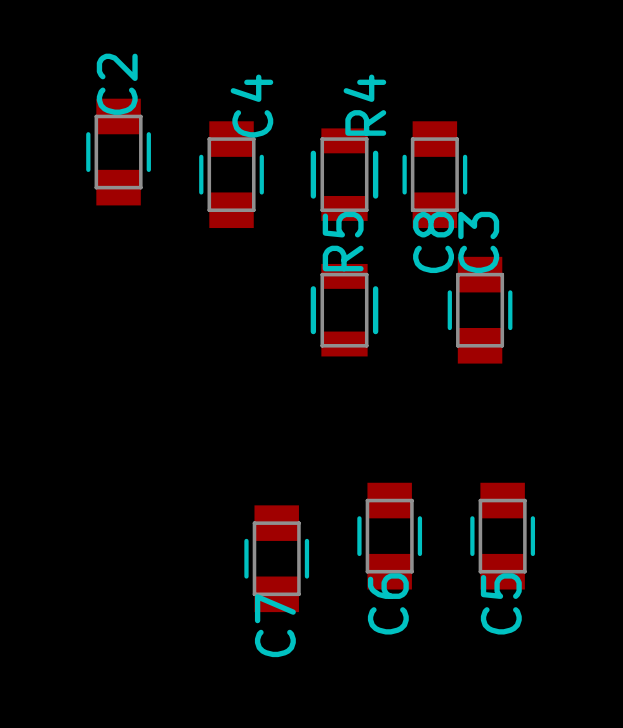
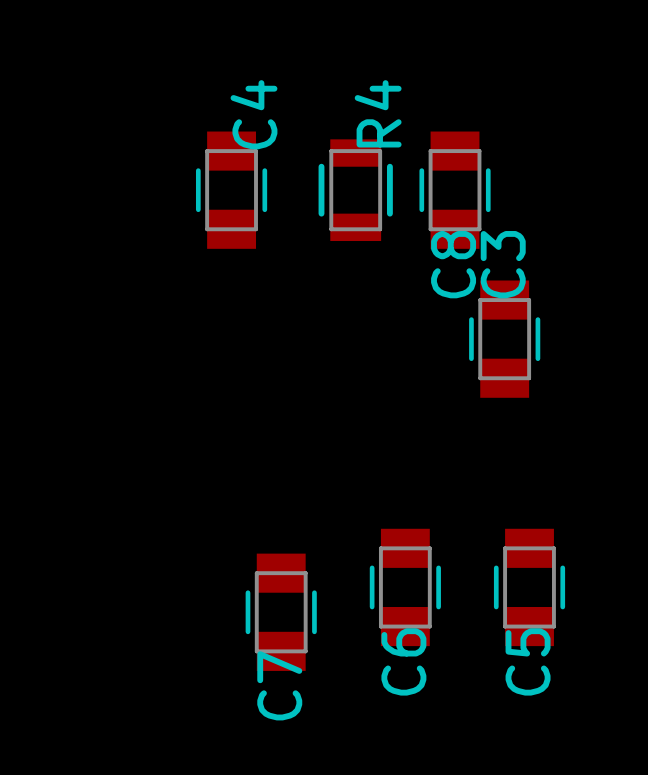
C2: (118, 152) -> none
R5: (344, 310) -> none

